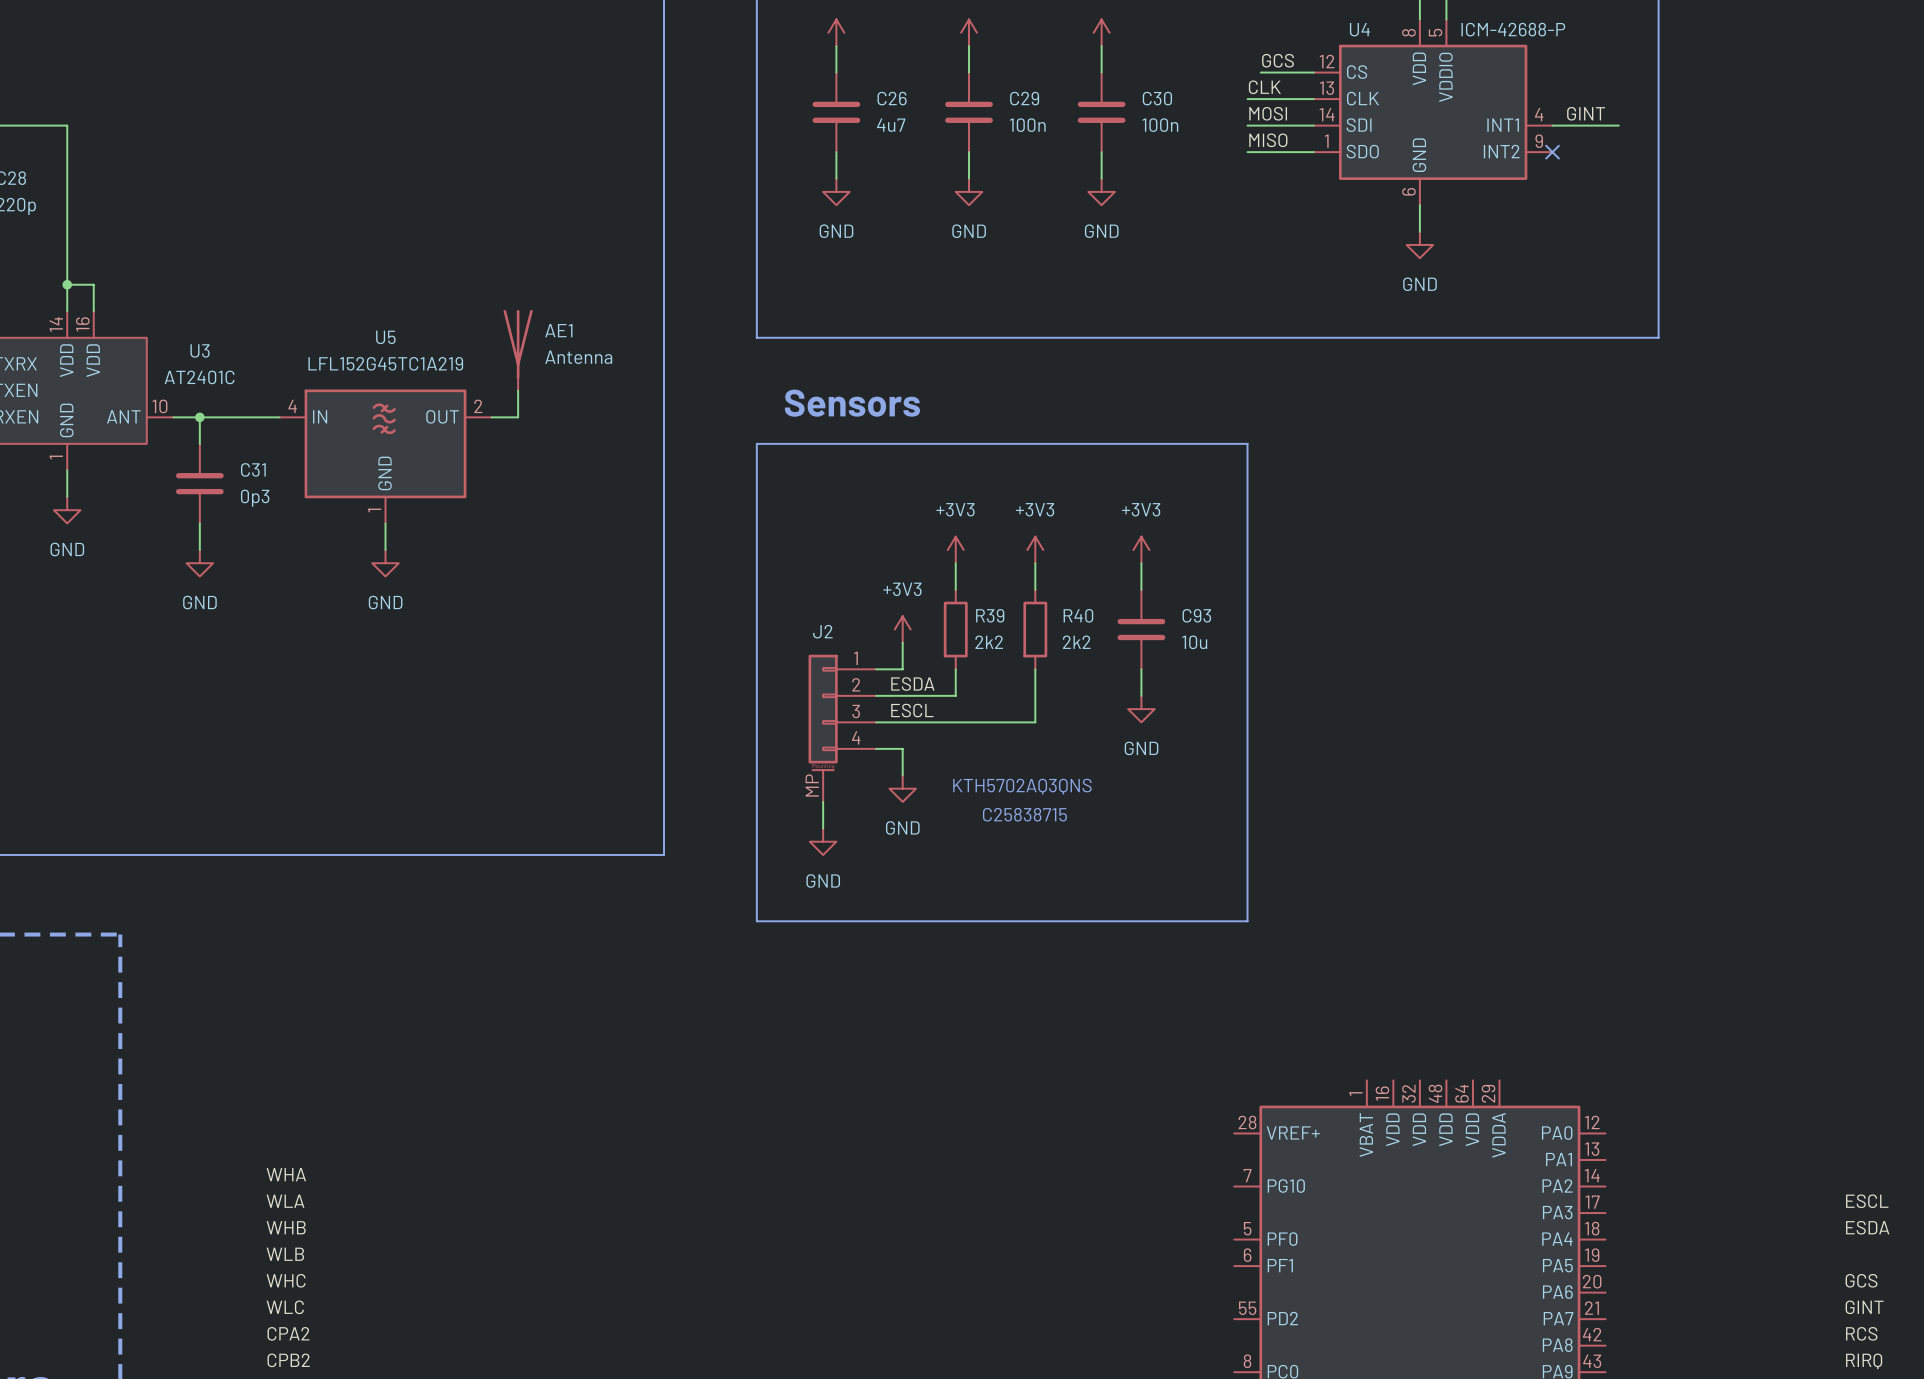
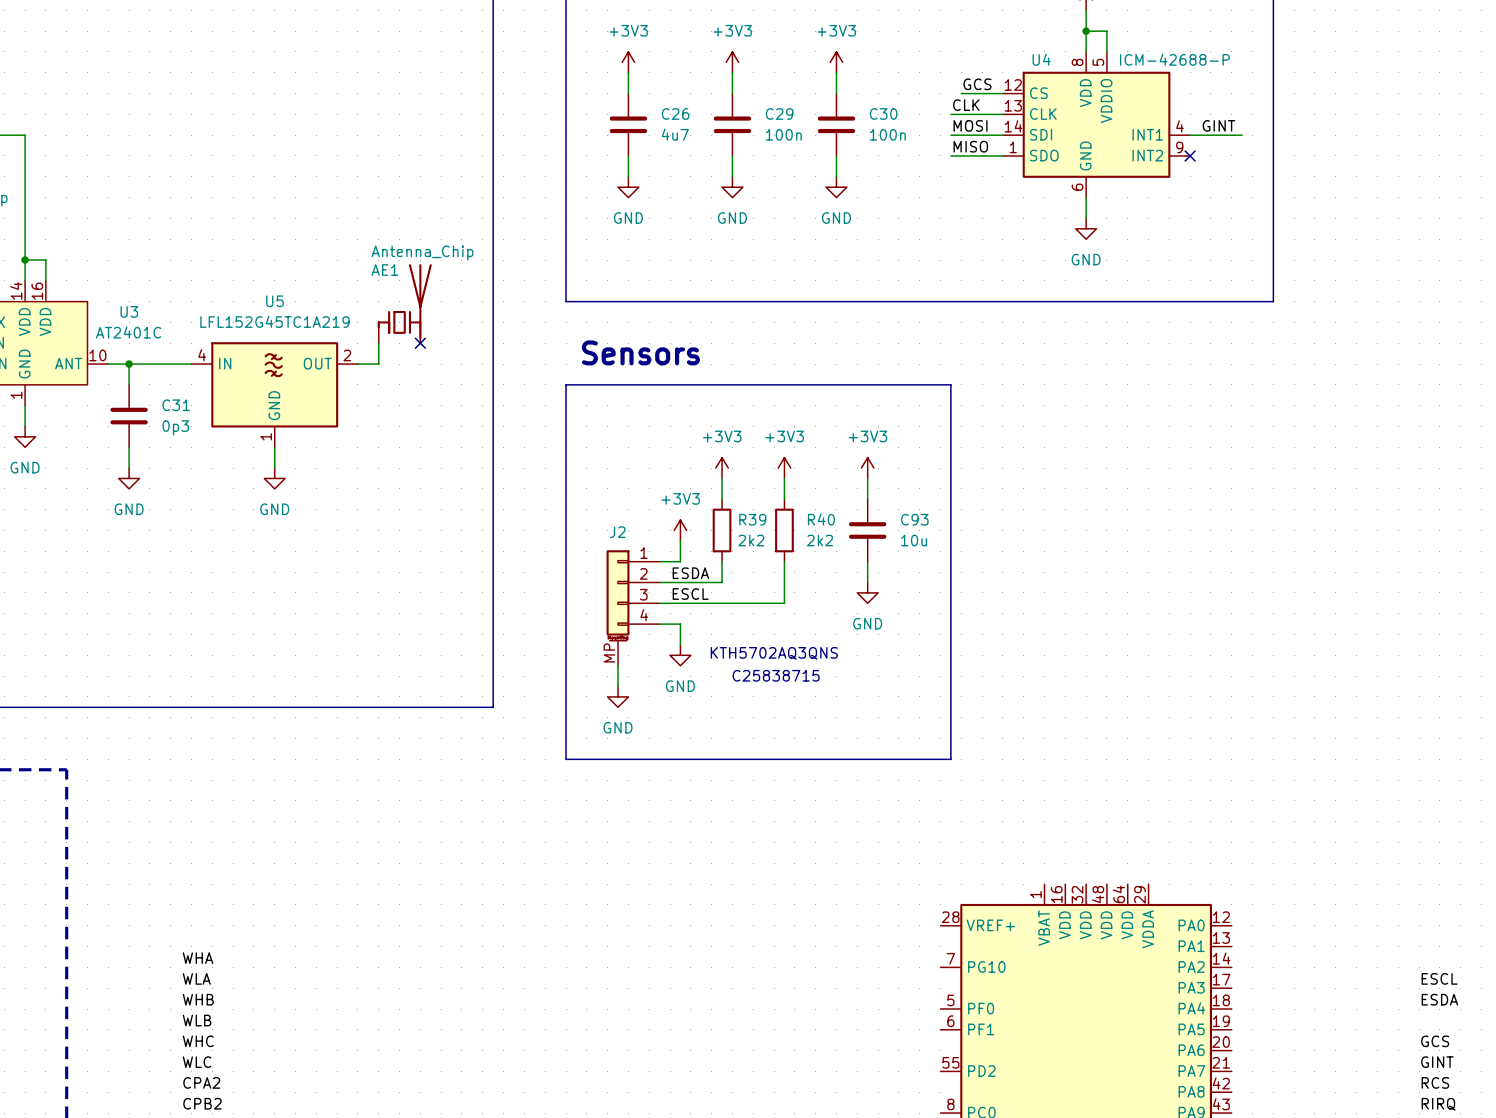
AE1 symbol: [503, 309, 533, 391] -> [377, 264, 432, 344]
AE1 name position: AE1 (558, 330) -> AE1 (384, 270)
AE1 value: Antenna (578, 357) -> Antenna_Chip (422, 253)
no-connect mark: none -> (420, 343)

